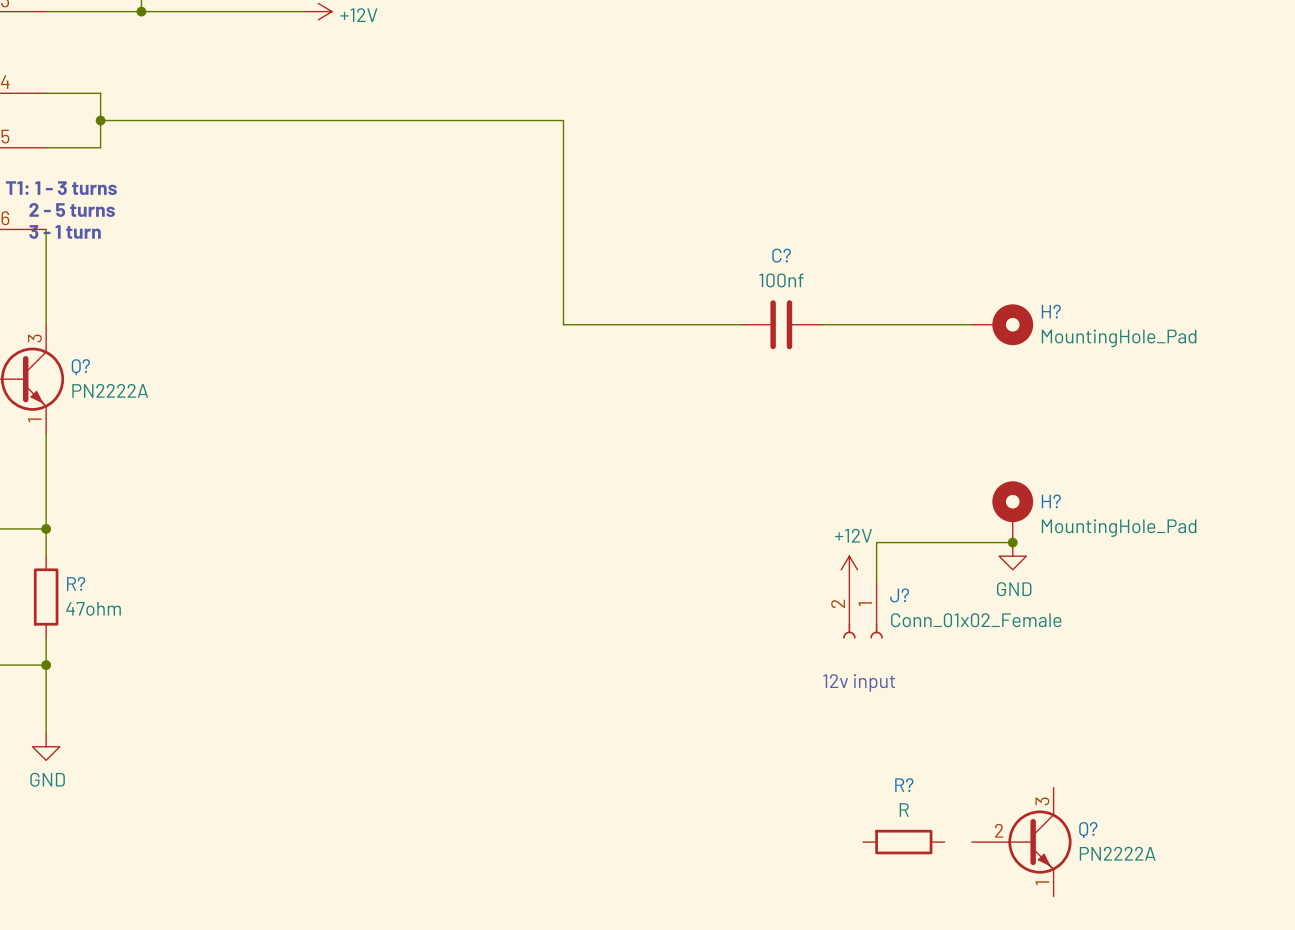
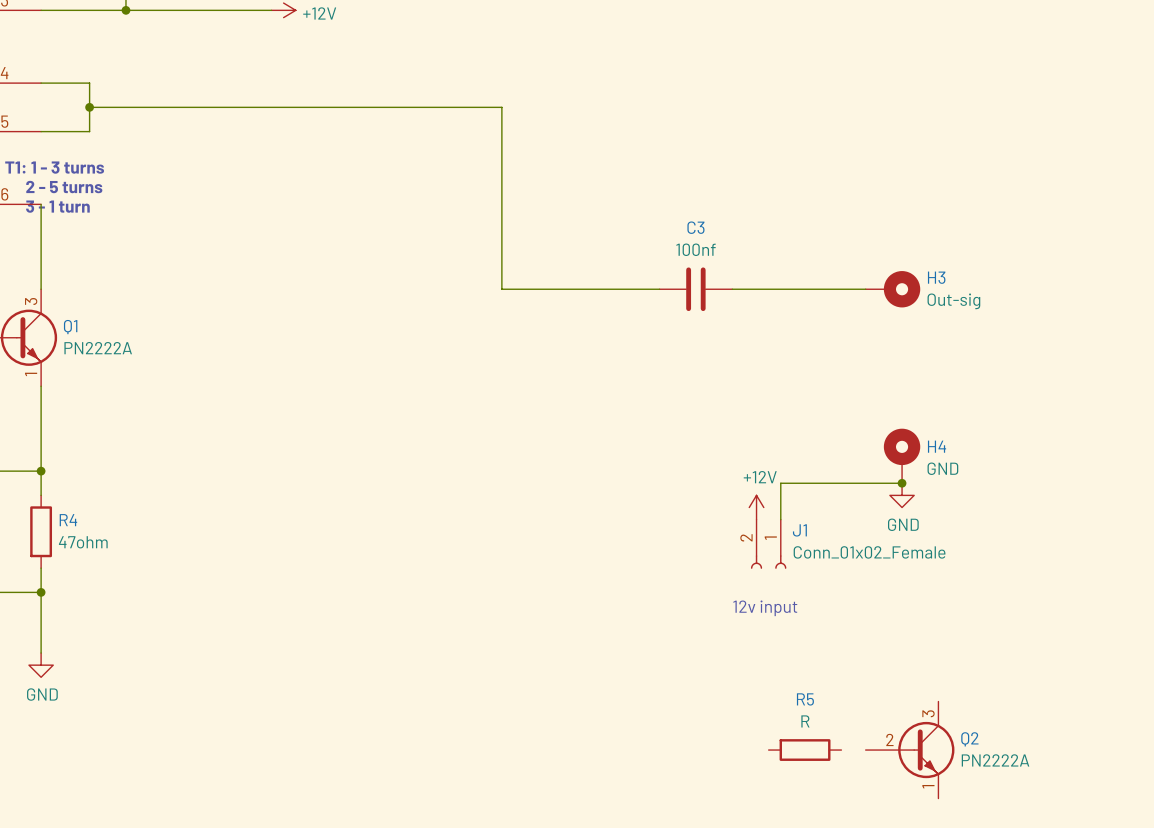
C? name: C? (781, 255) -> C3 (695, 227)
H? name: H? (1051, 311) -> H3 (936, 277)
H? value: MountingHole_Pad (1119, 338) -> Out-sig (953, 301)
Q? name: Q? (80, 367) -> Q1 (70, 327)
H? name: H? (1051, 501) -> H4 (937, 446)
H? value: MountingHole_Pad (1119, 528) -> GND (942, 468)
R? name: R? (76, 583) -> R4 (68, 520)
J? name: J? (899, 595) -> J1 (799, 530)
R? name: R? (904, 785) -> R5 (805, 699)
Q? name: Q? (1088, 830) -> Q2 (969, 739)

